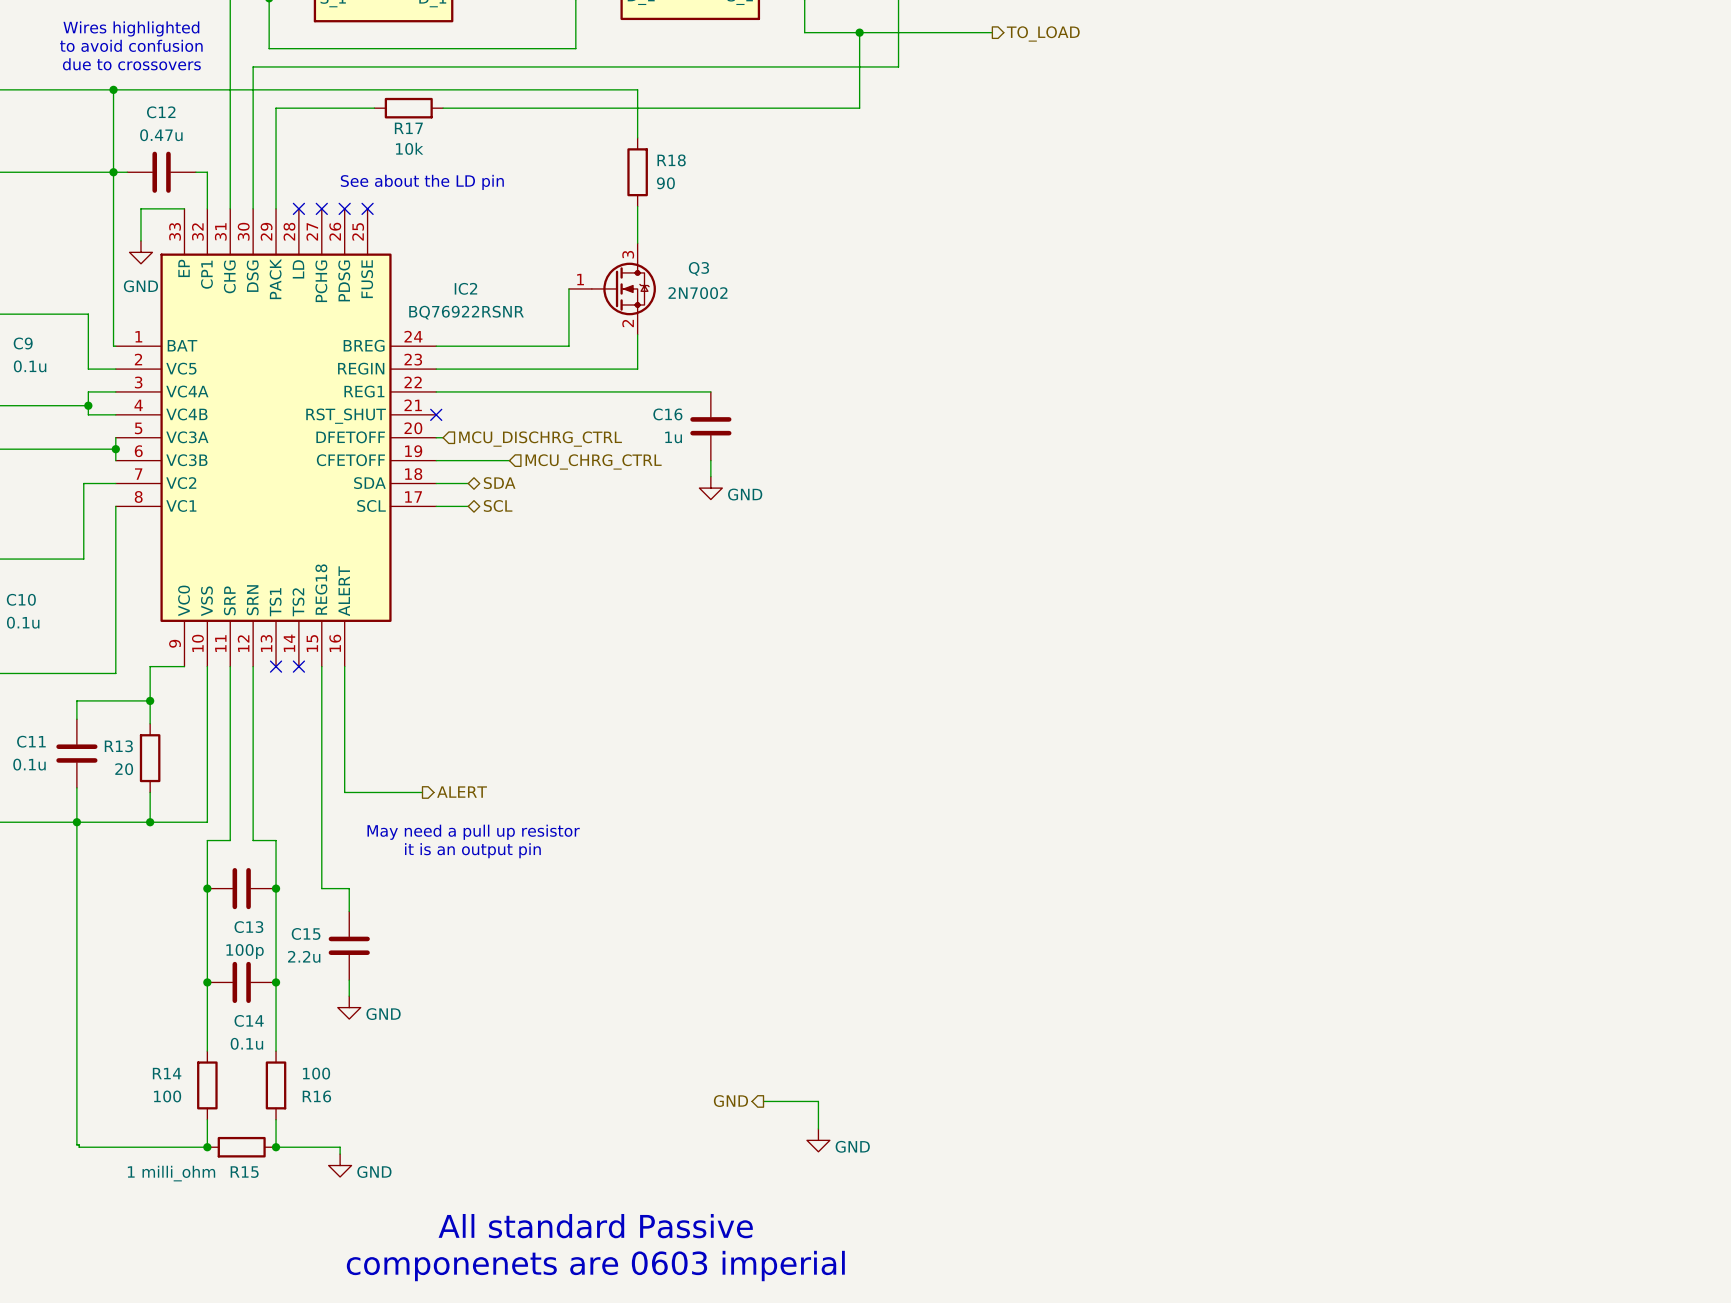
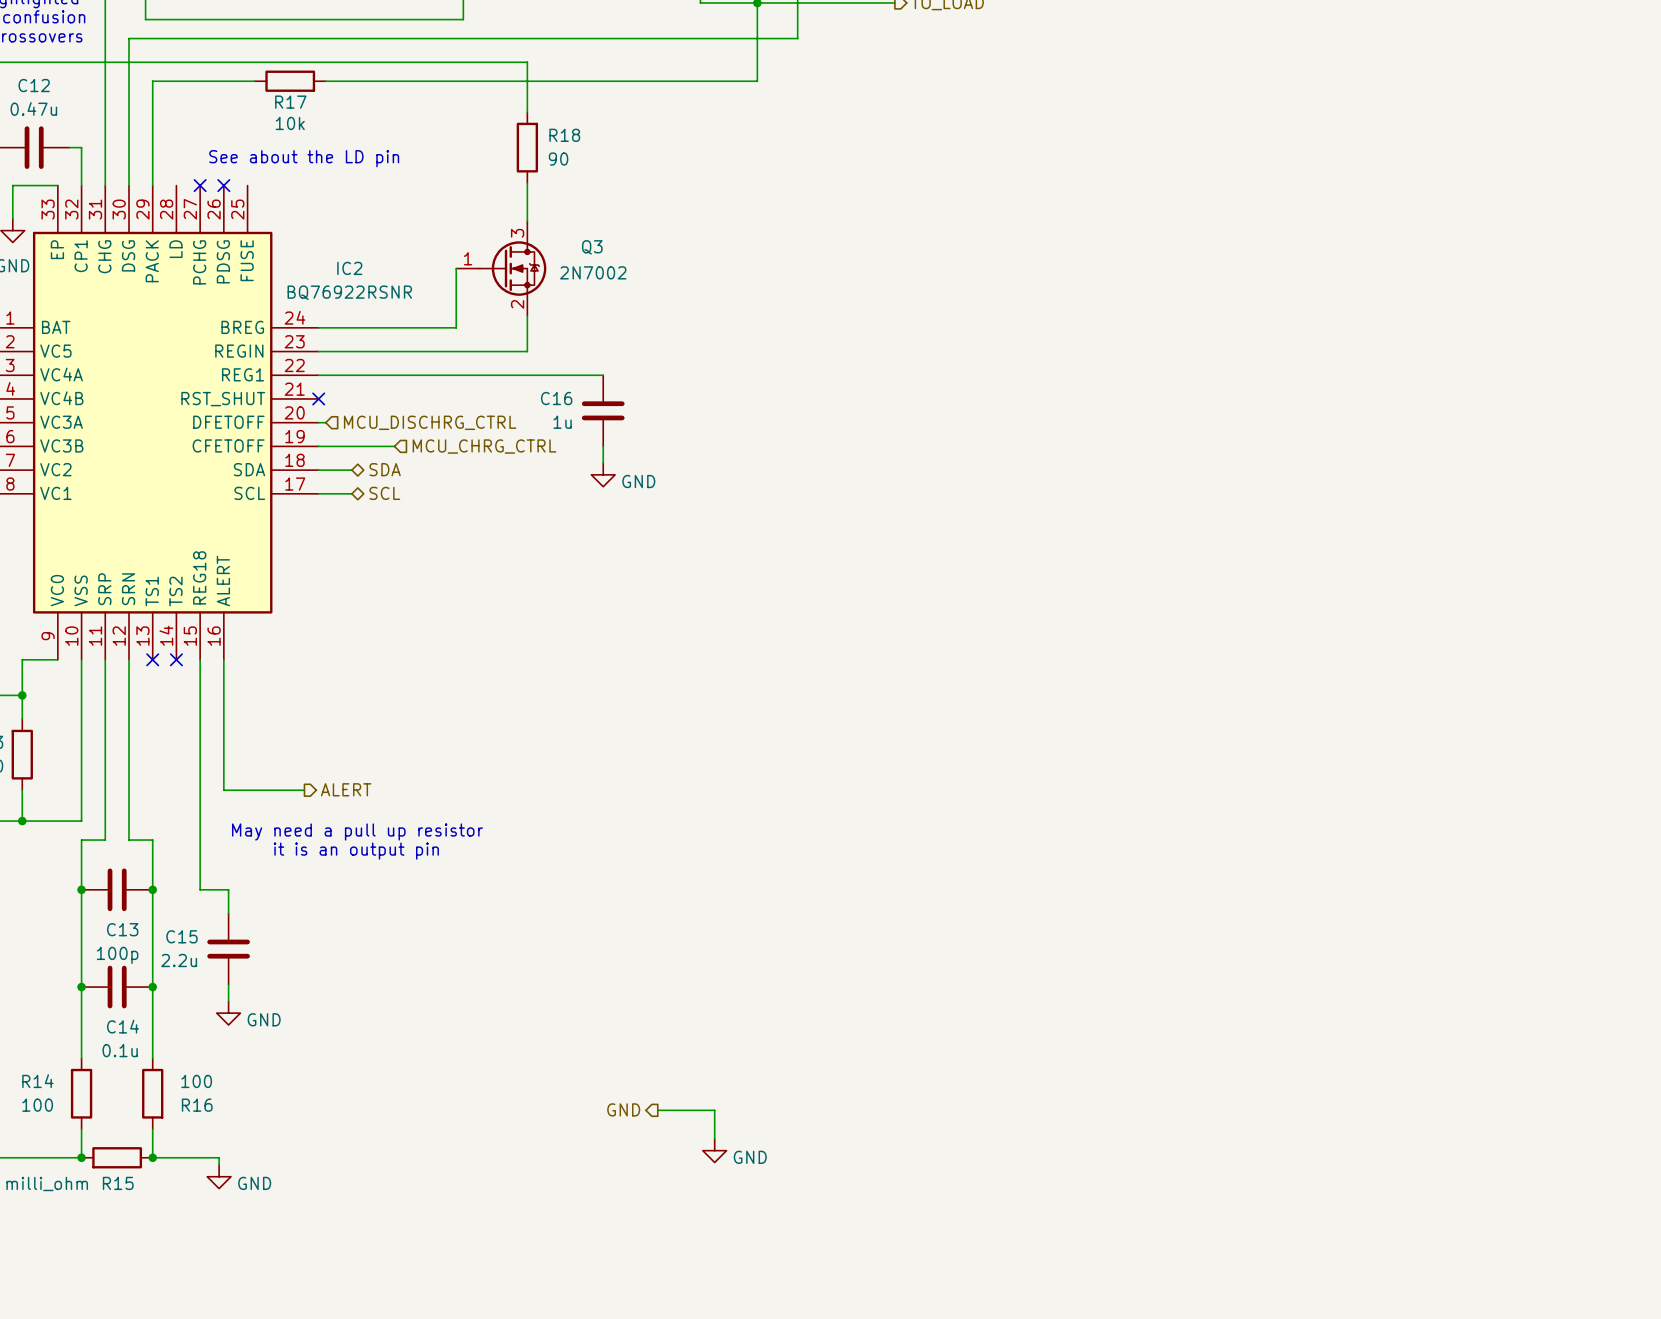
no-connect mark: (298, 208) -> none
no-connect mark: (367, 208) -> none
text: All standard Passive (595, 1226) -> none
text: componenets are 0603 imperial (595, 1266) -> none

